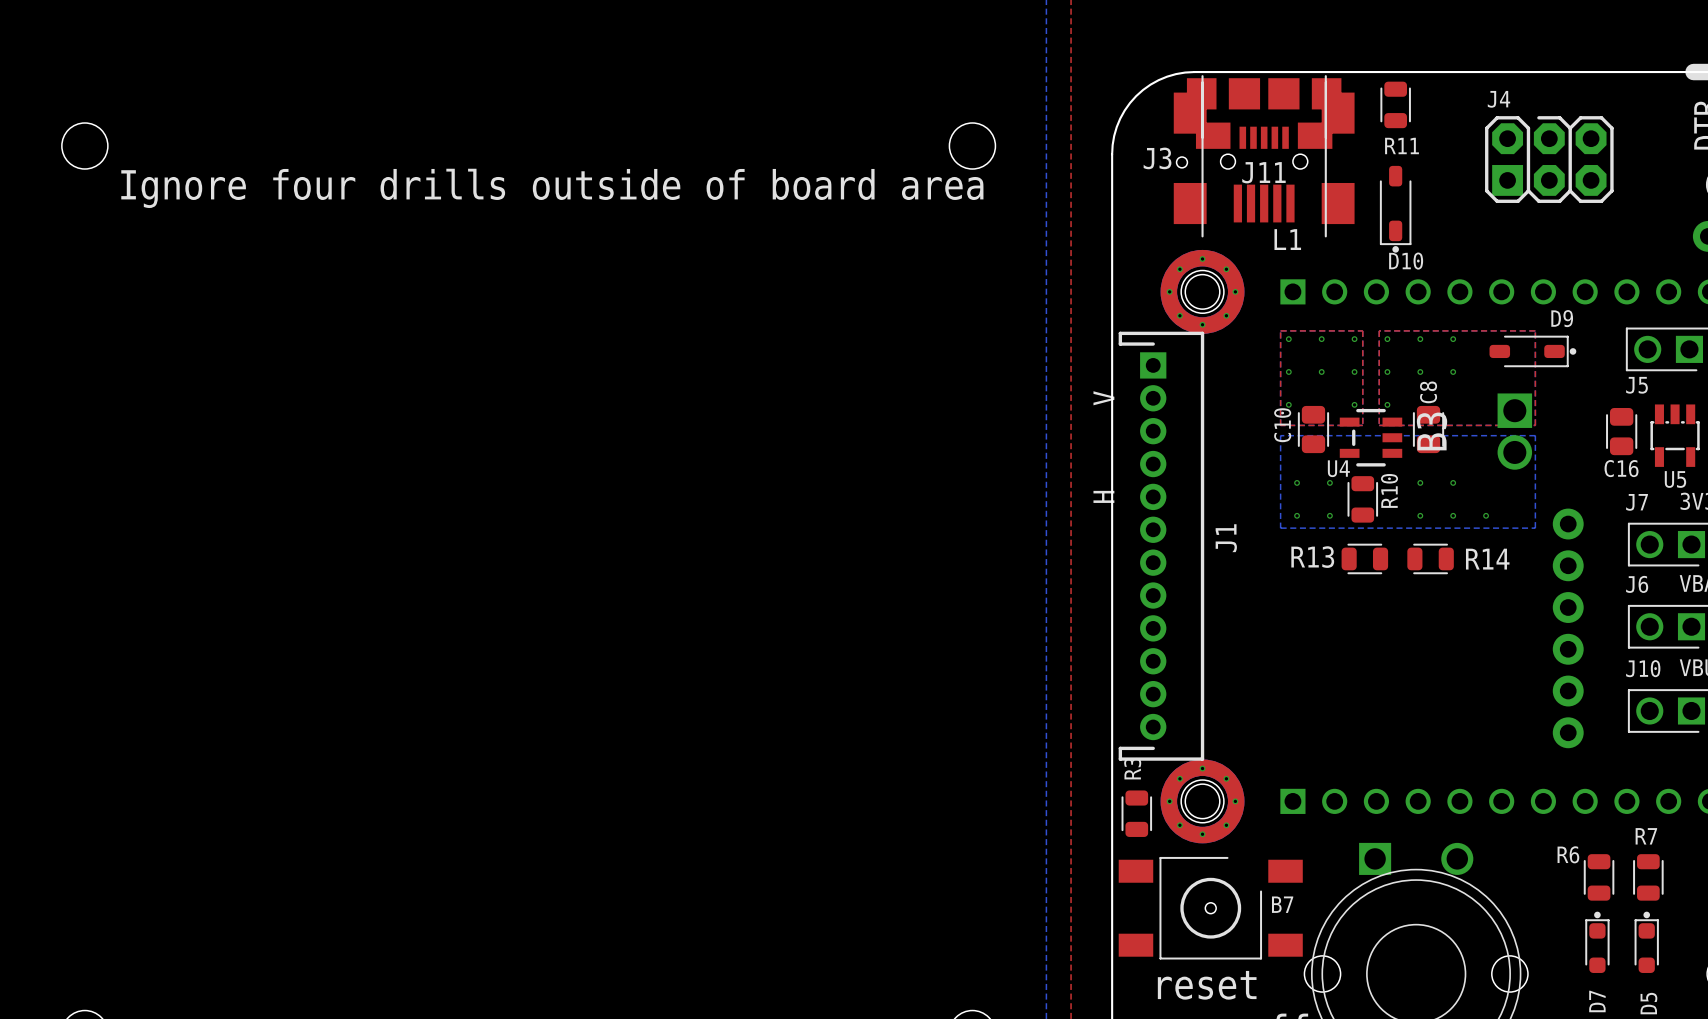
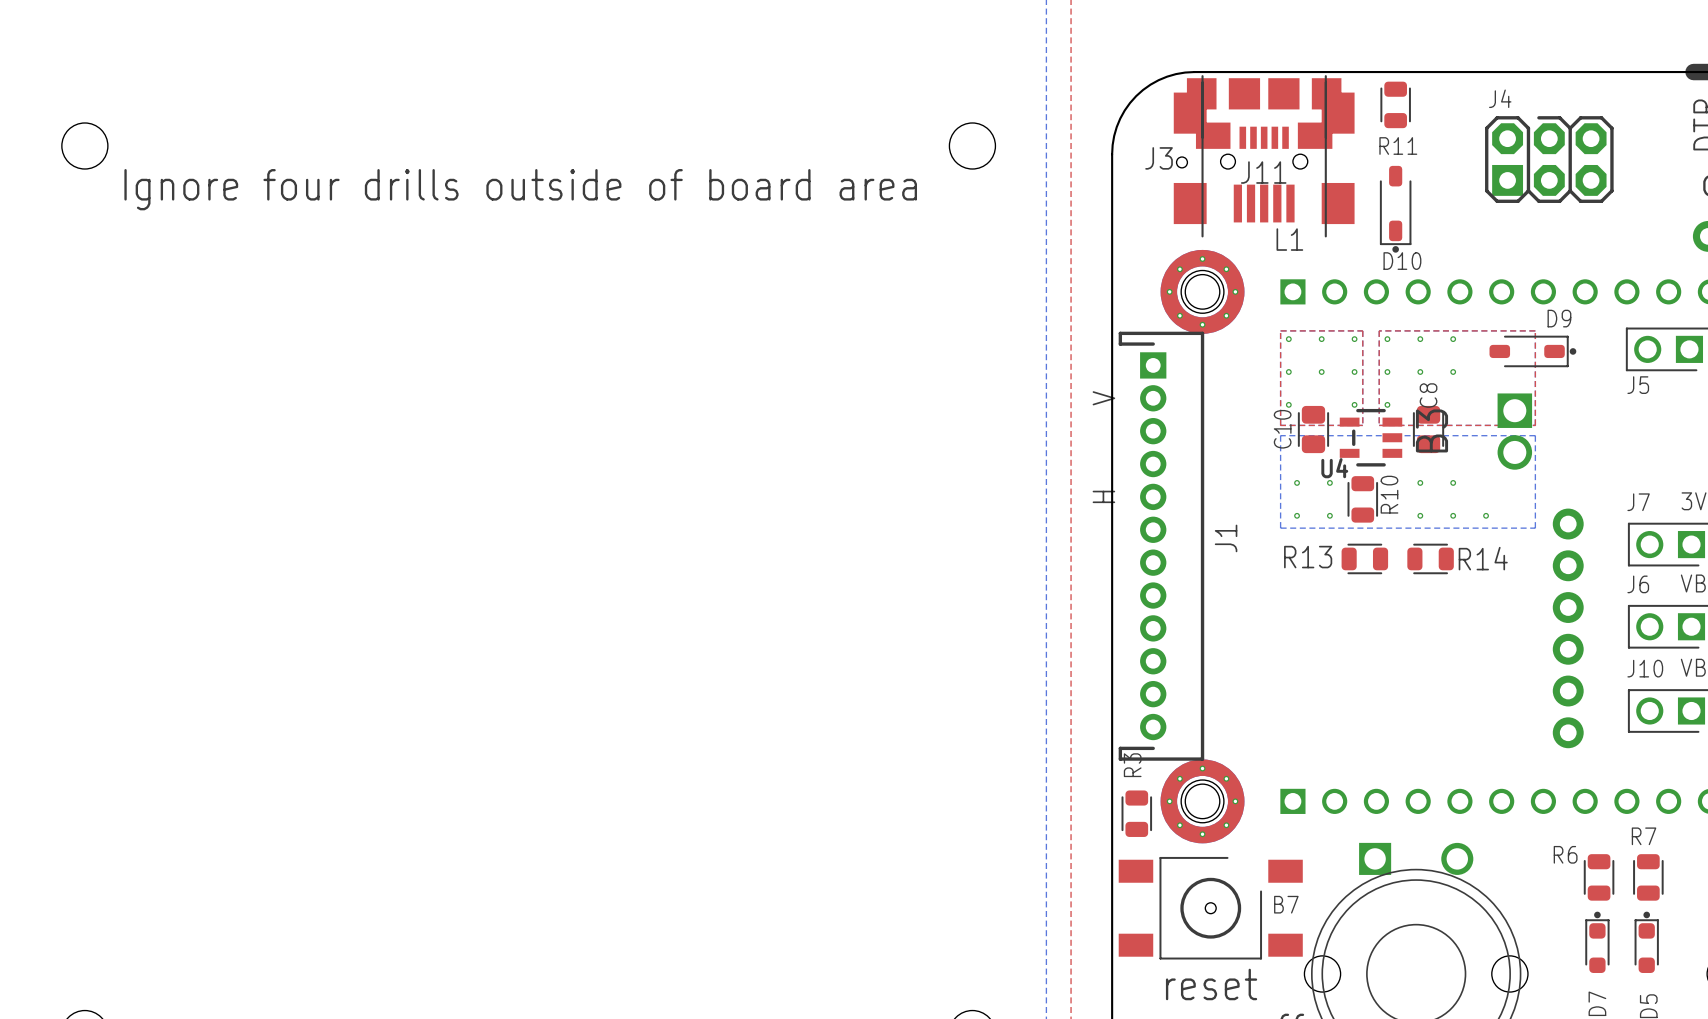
C16: (1621, 431) -> none
U5: (1675, 435) -> none

